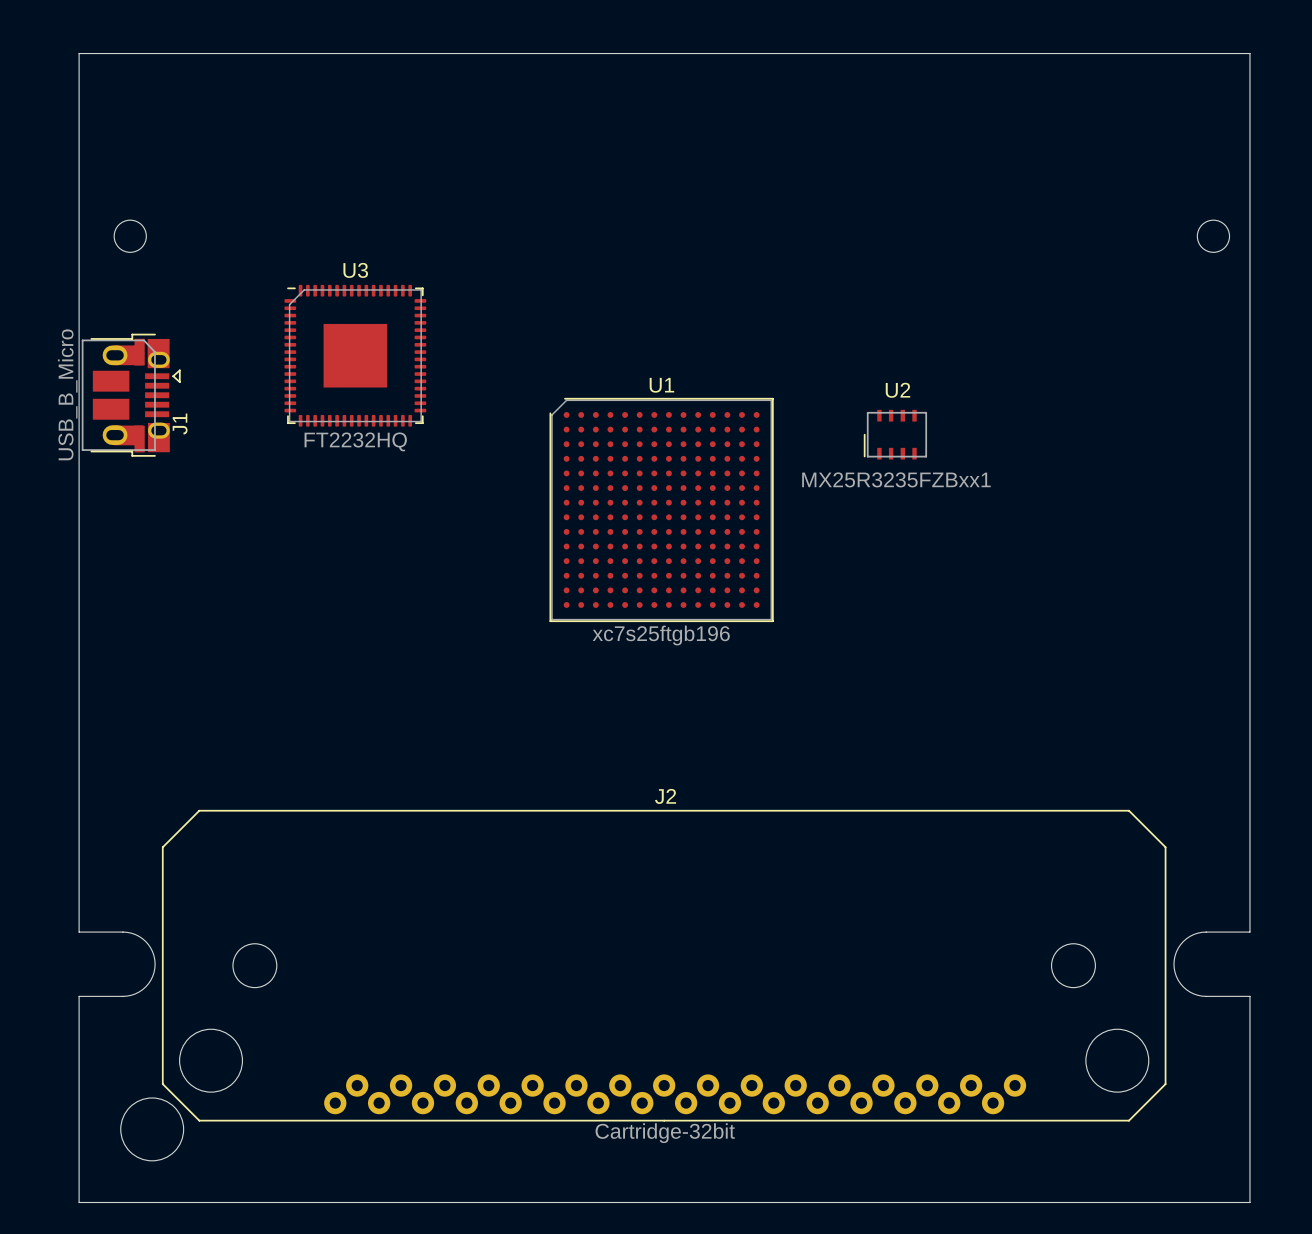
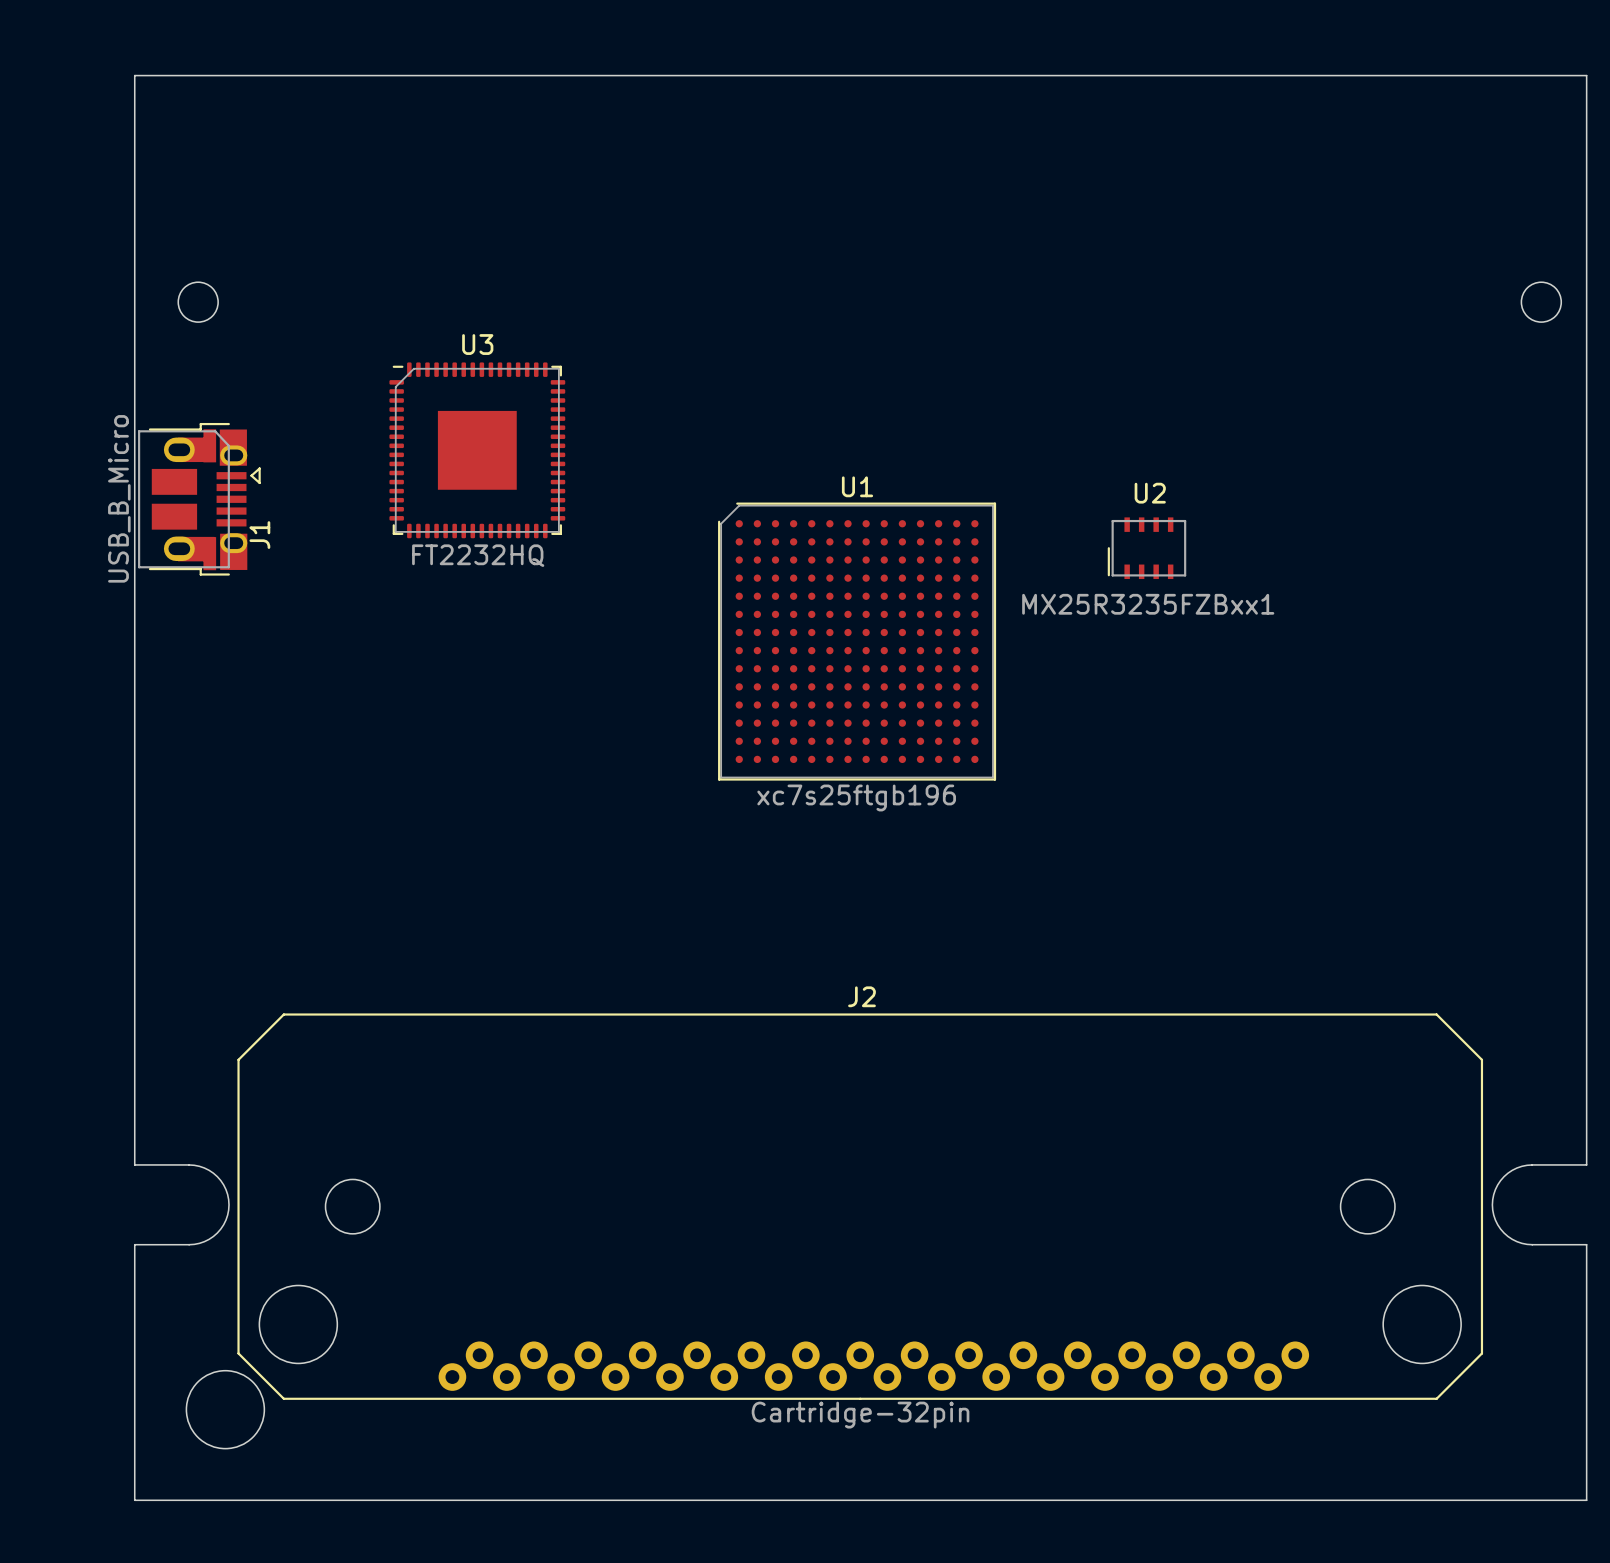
J2 value: Cartridge-32bit (665, 1133) -> Cartridge-32pin (860, 1415)

